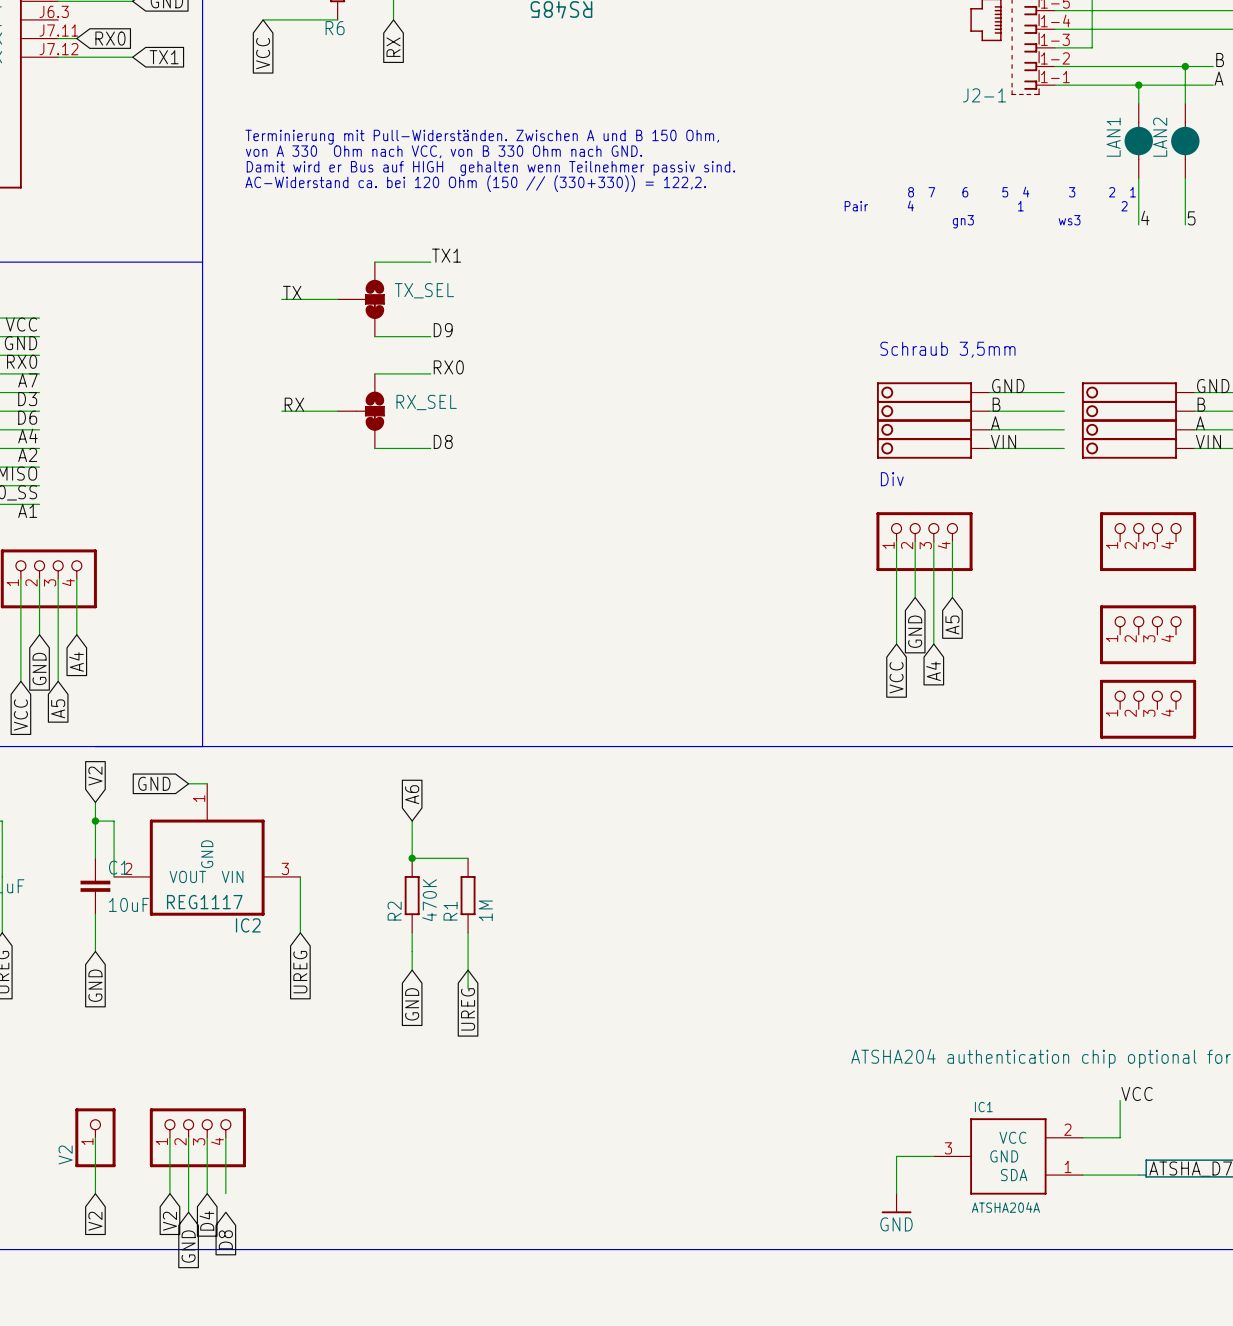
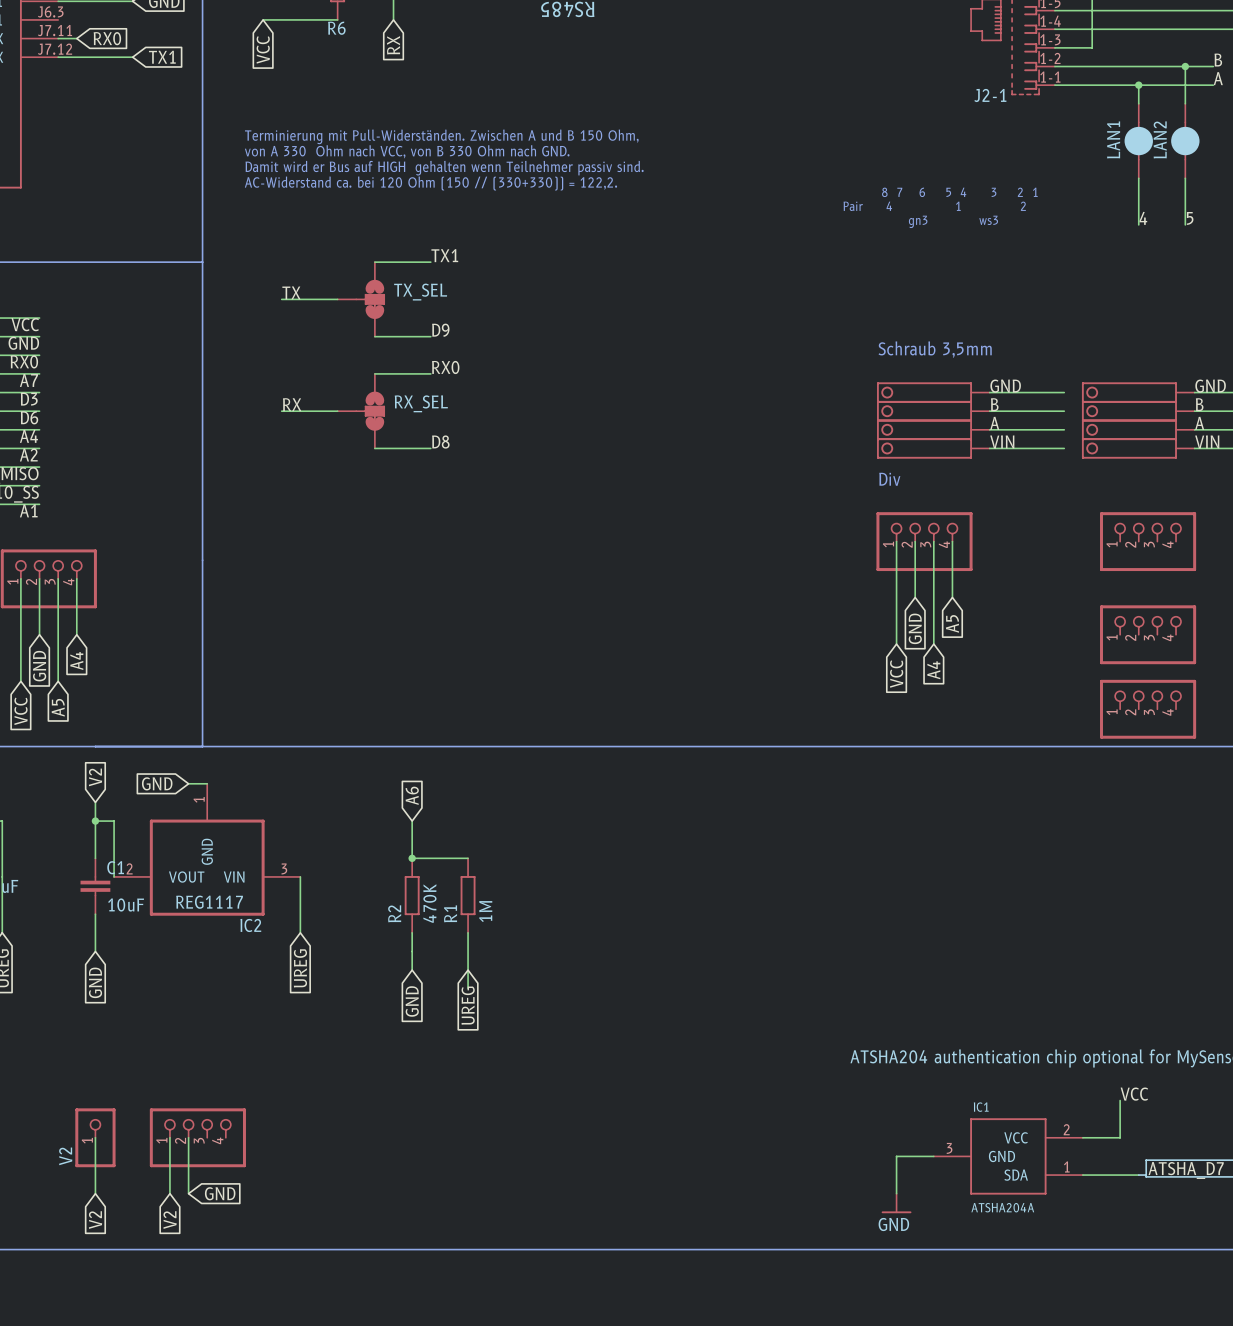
wire: (207, 1137) (207, 1193) -> none
wire: (225, 1137) (225, 1193) -> none
wire: (188, 1193) (188, 1212) -> none
global label: D4 (206, 1220) -> none
global label: D8 (225, 1239) -> none
global label rotation: 0° (188, 1246) -> 90° counterclockwise (220, 1193)

